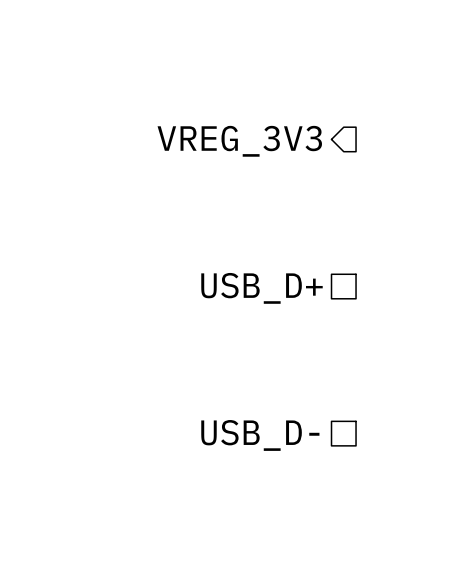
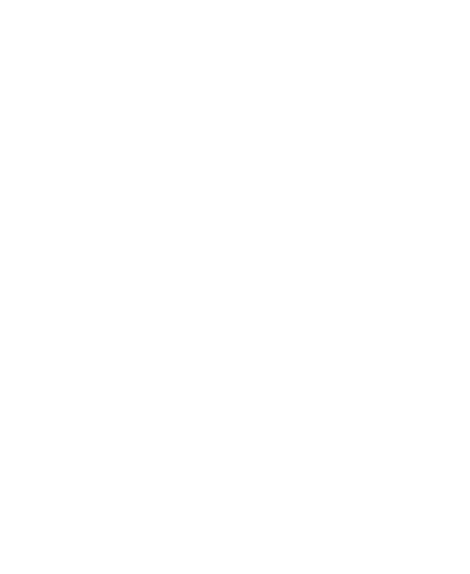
hierarchical label: VREG_3V3 (239, 141) -> none
hierarchical label: USB_D+ (261, 288) -> none
hierarchical label: USB_D- (260, 435) -> none

